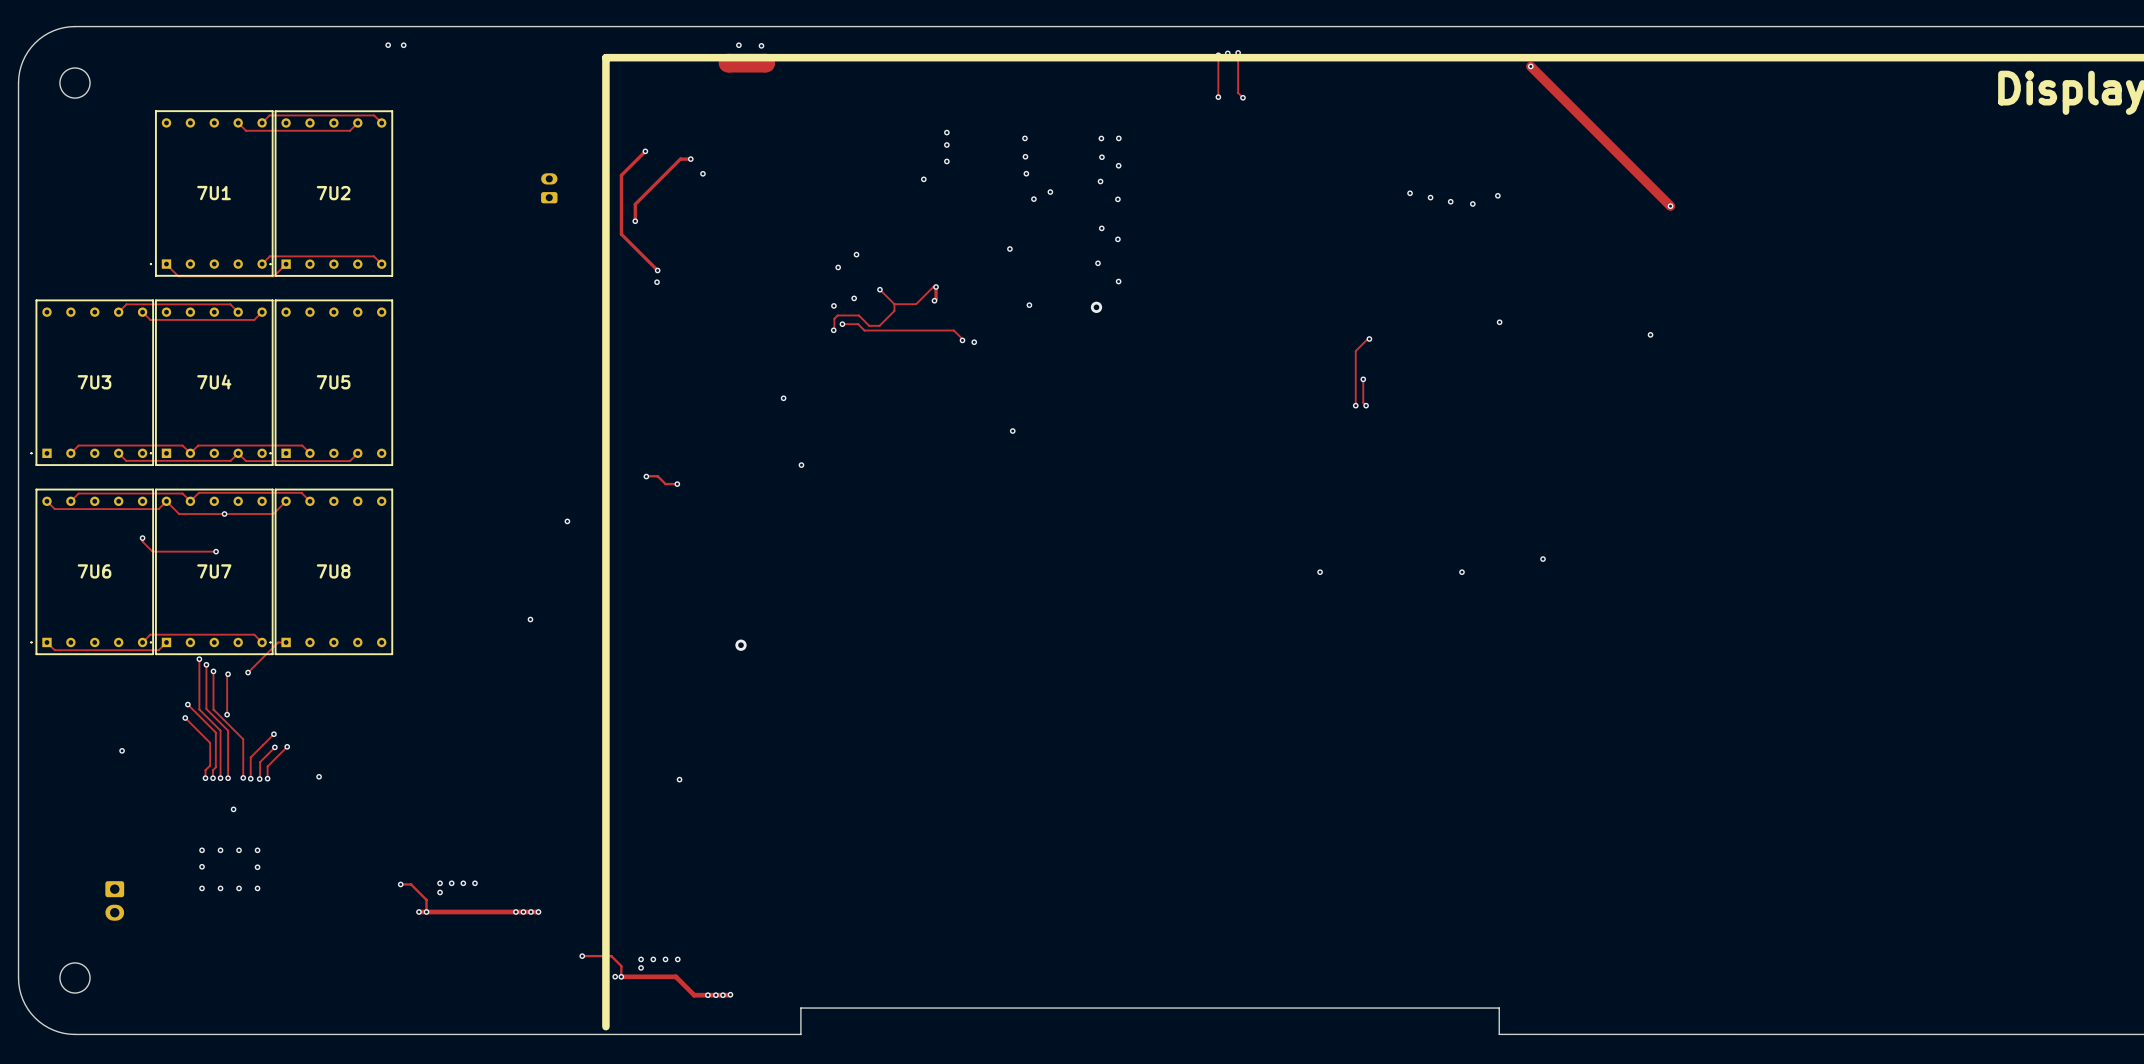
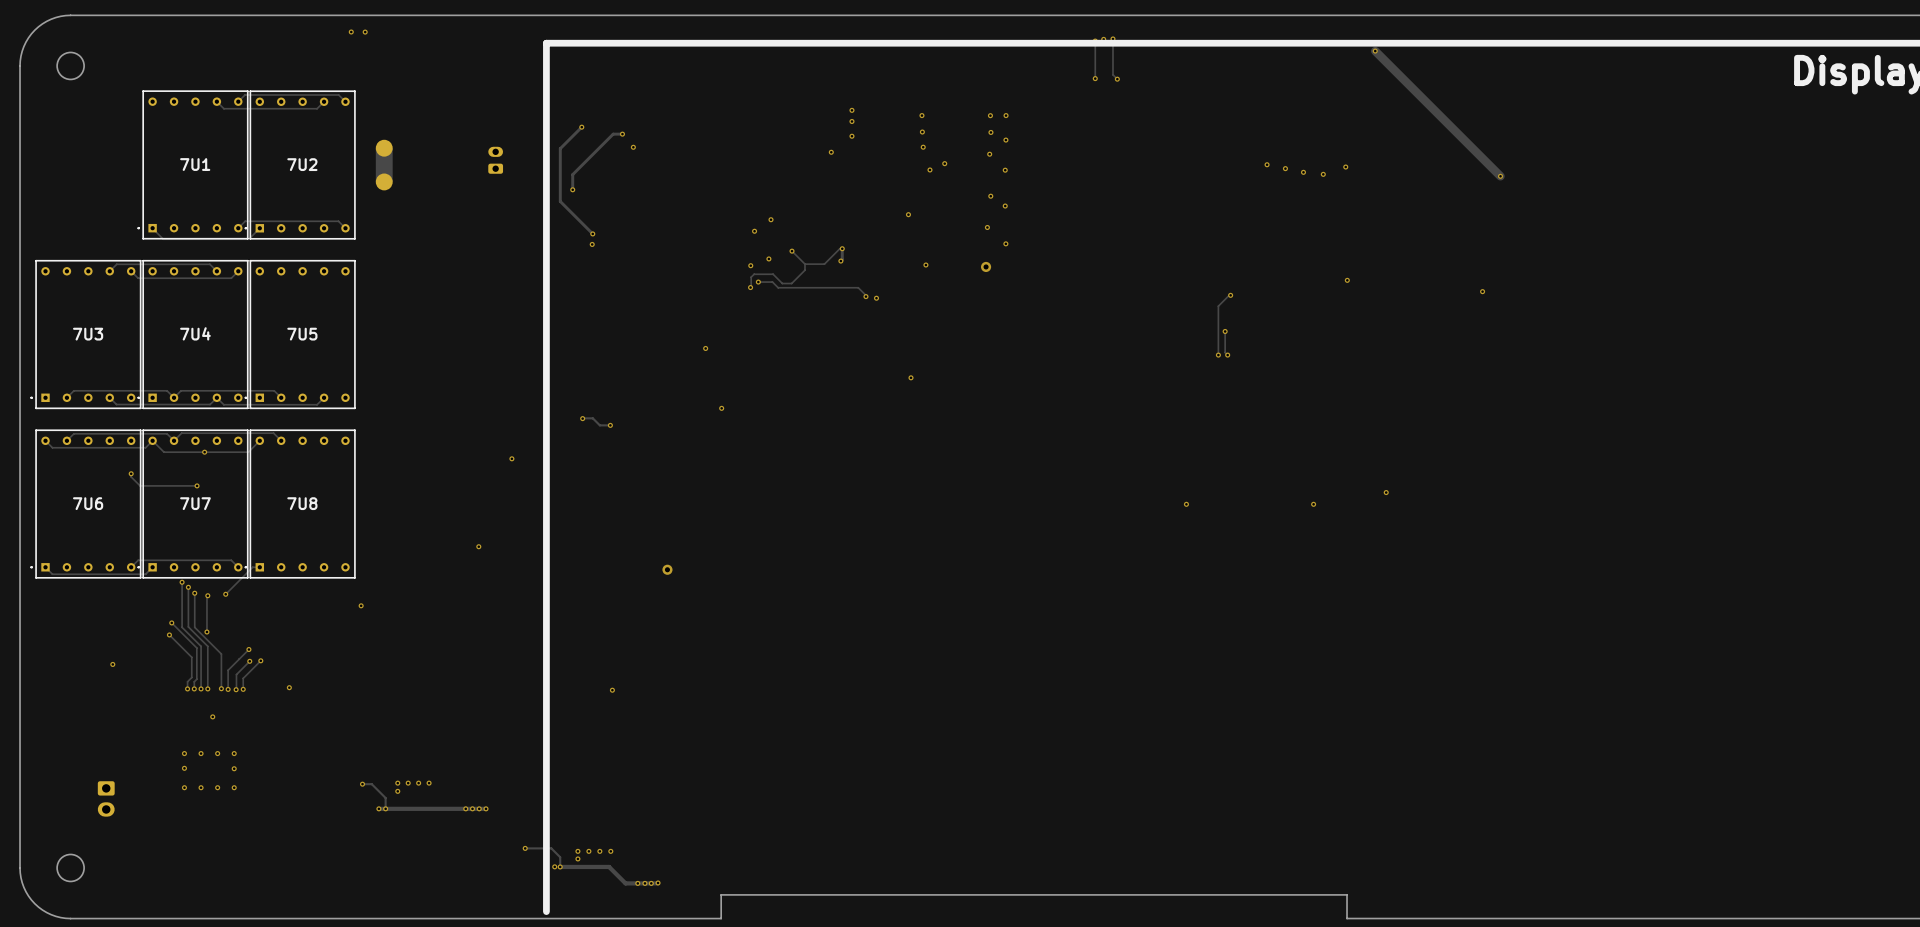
via: (738, 45) -> none
via: (761, 45) -> none
part: (746, 63) -> none
part: none -> (384, 165)
via: none -> (361, 605)

